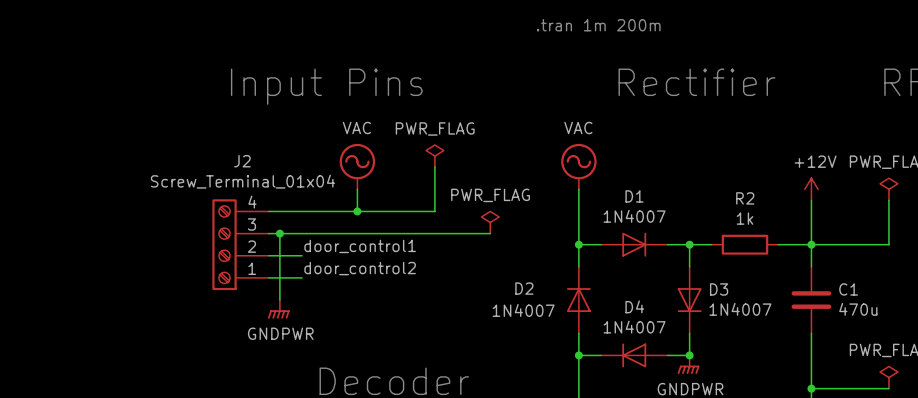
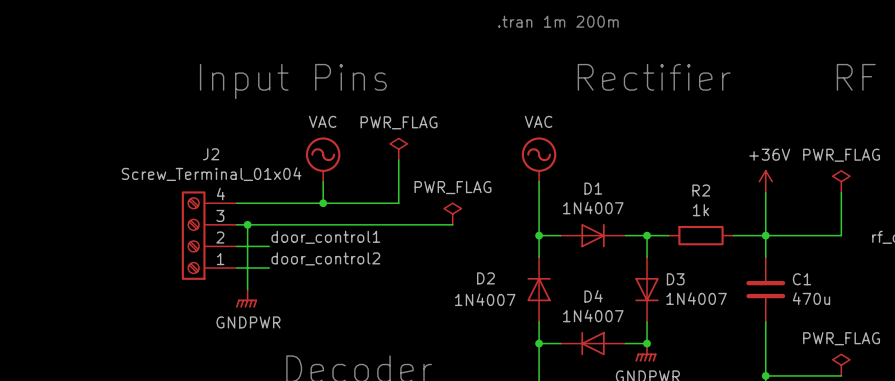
power symbol: +12V (811, 189) -> +36V (765, 181)

